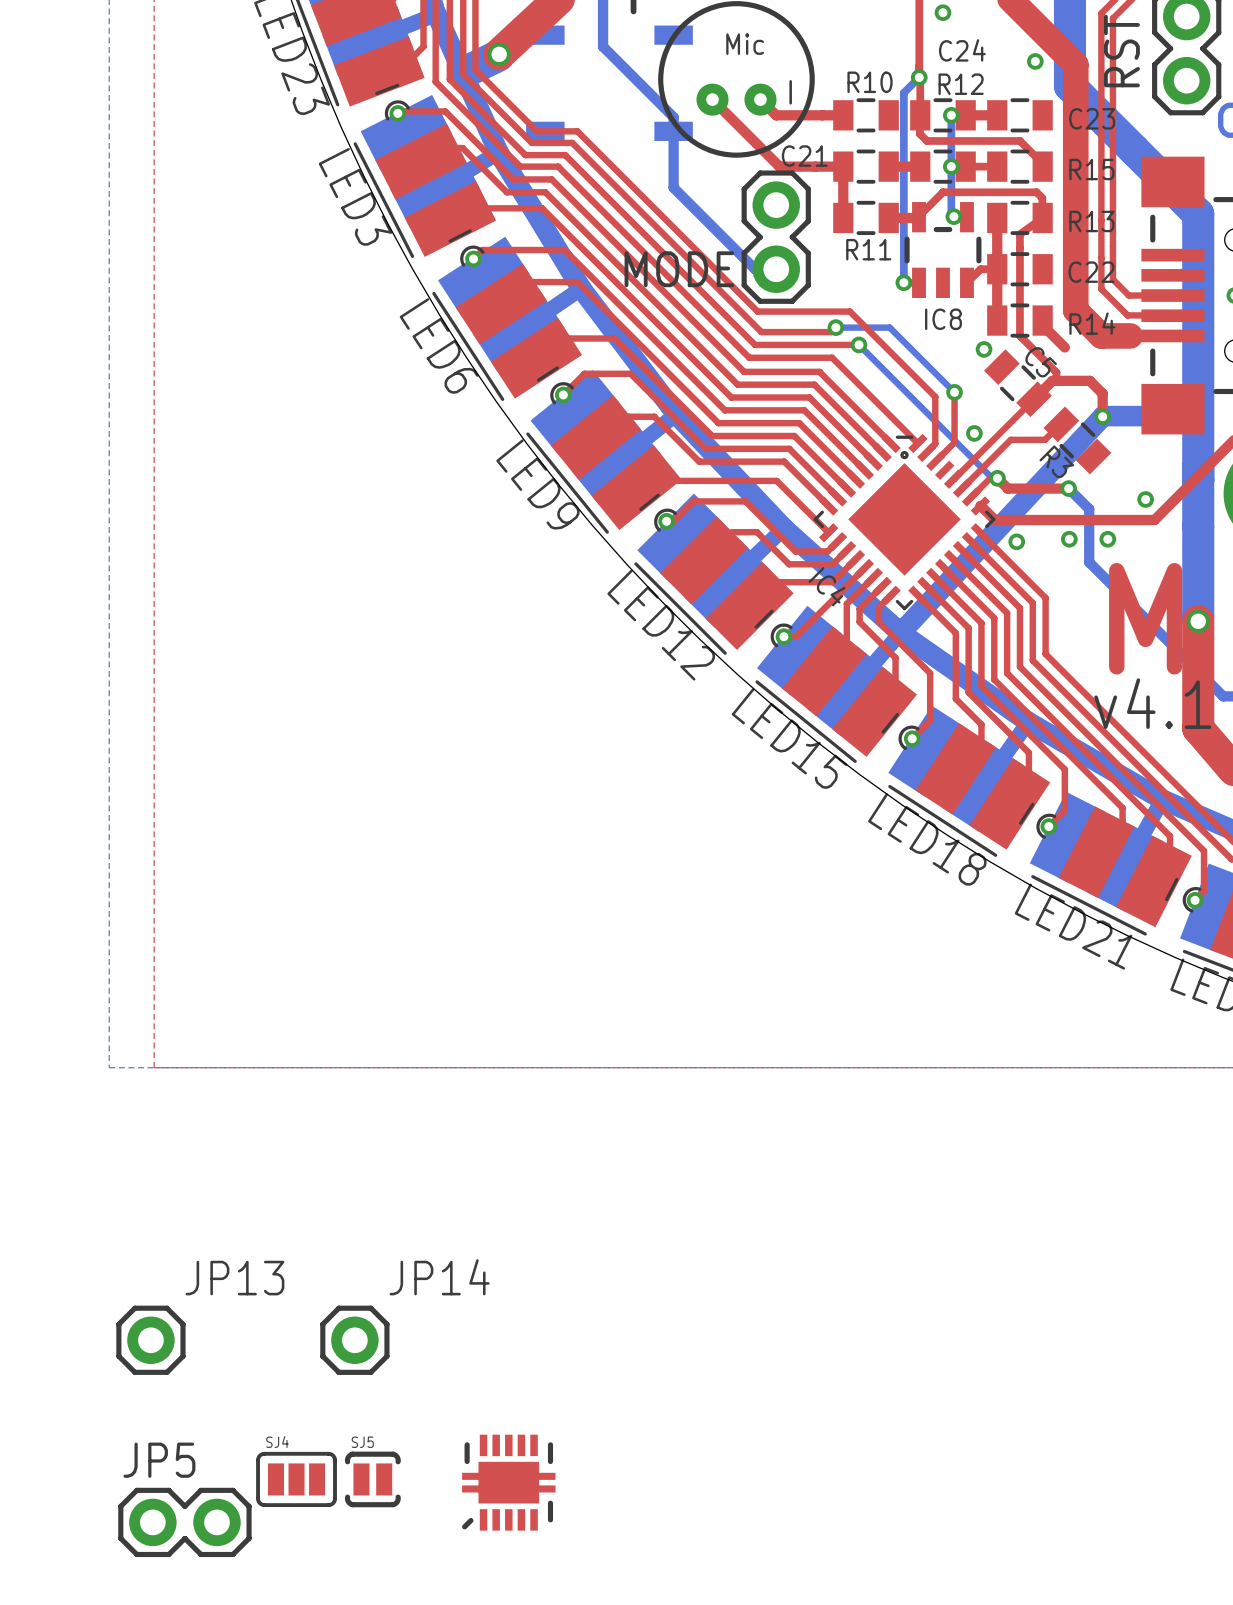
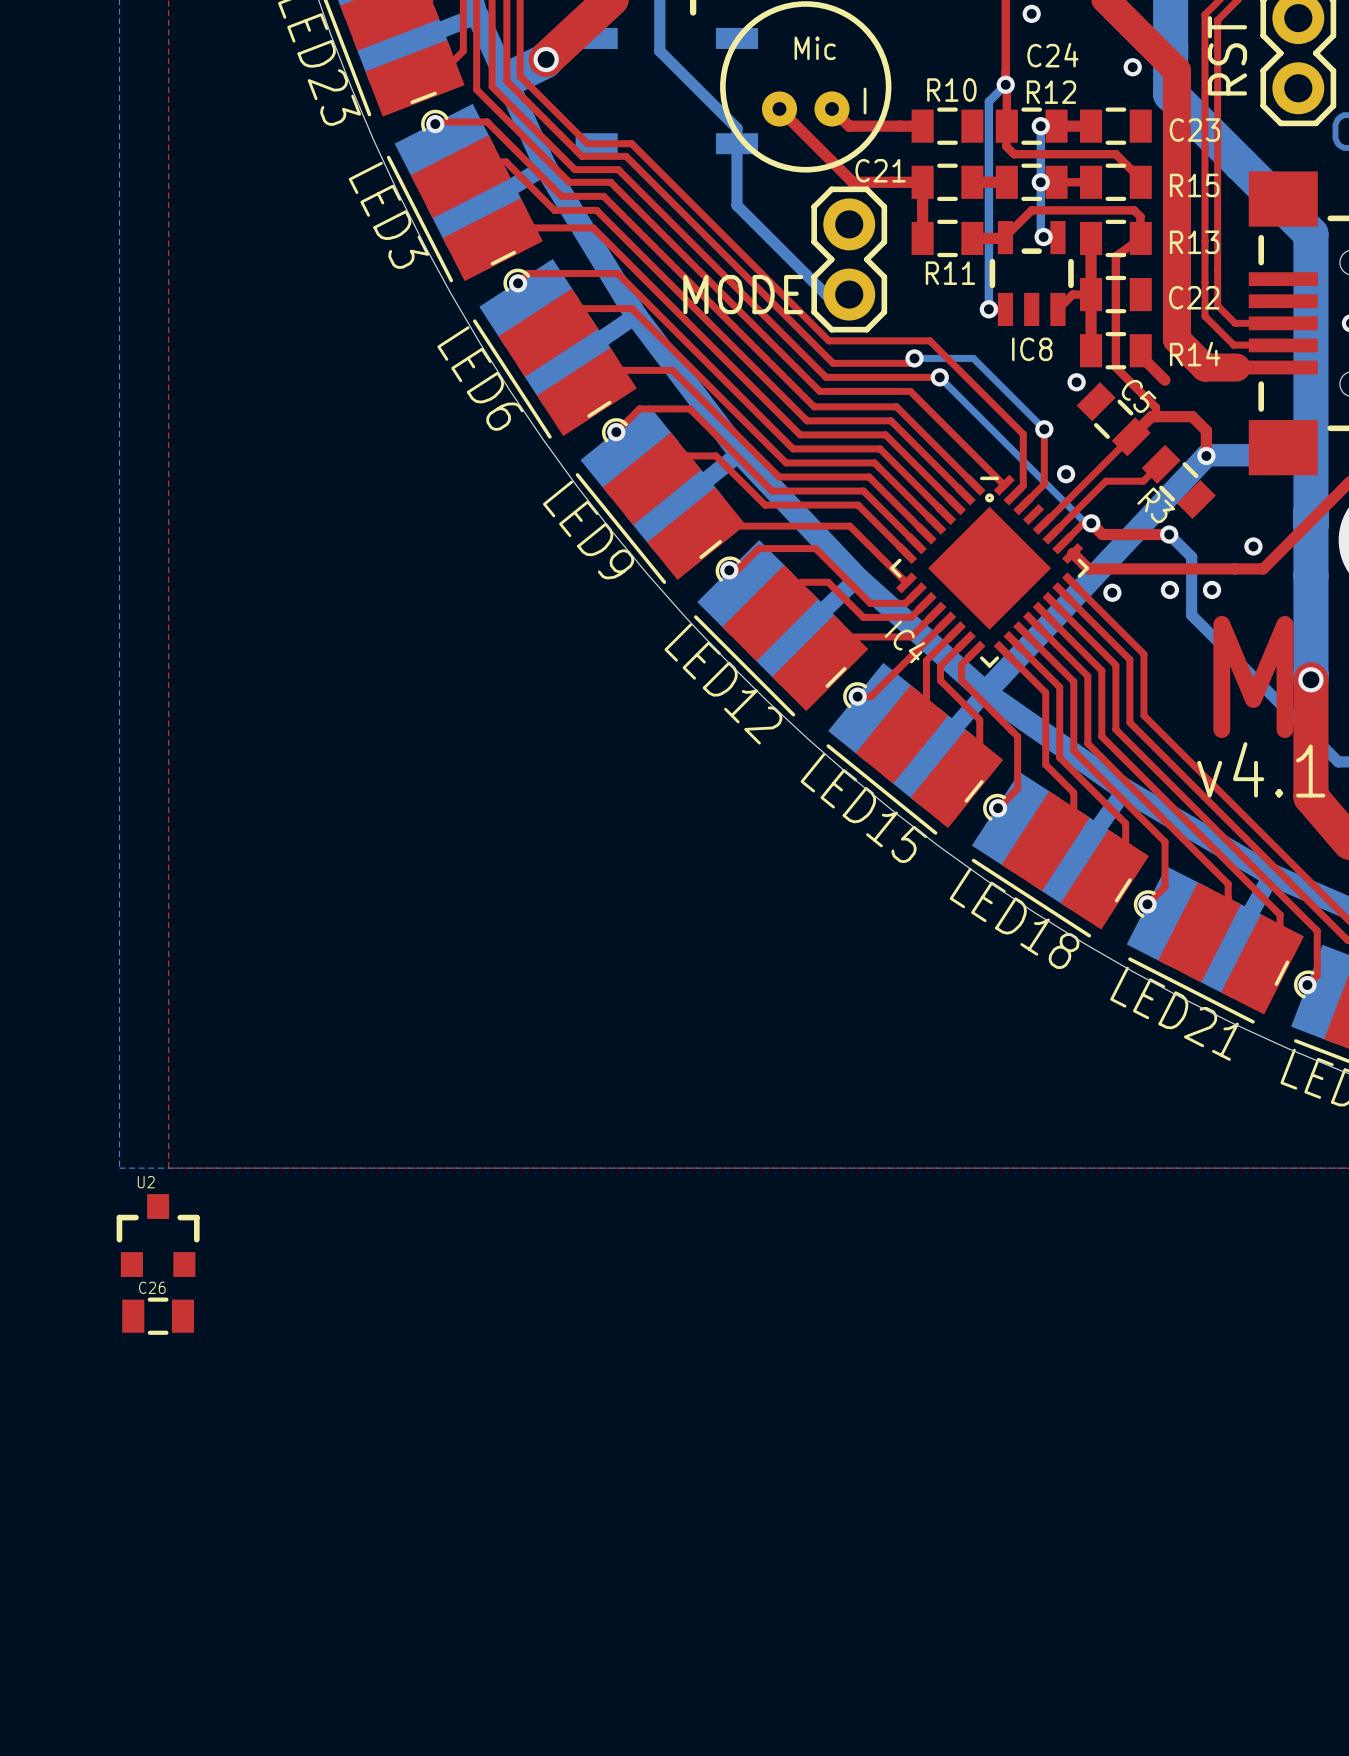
U2: none -> (158, 1235)
C26: none -> (158, 1316)
JP13: (150, 1340) -> none
JP14: (354, 1340) -> none
SJ4: (296, 1479) -> none
SJ5: (372, 1479) -> none
part: (508, 1482) -> none
JP5: (184, 1522) -> none

